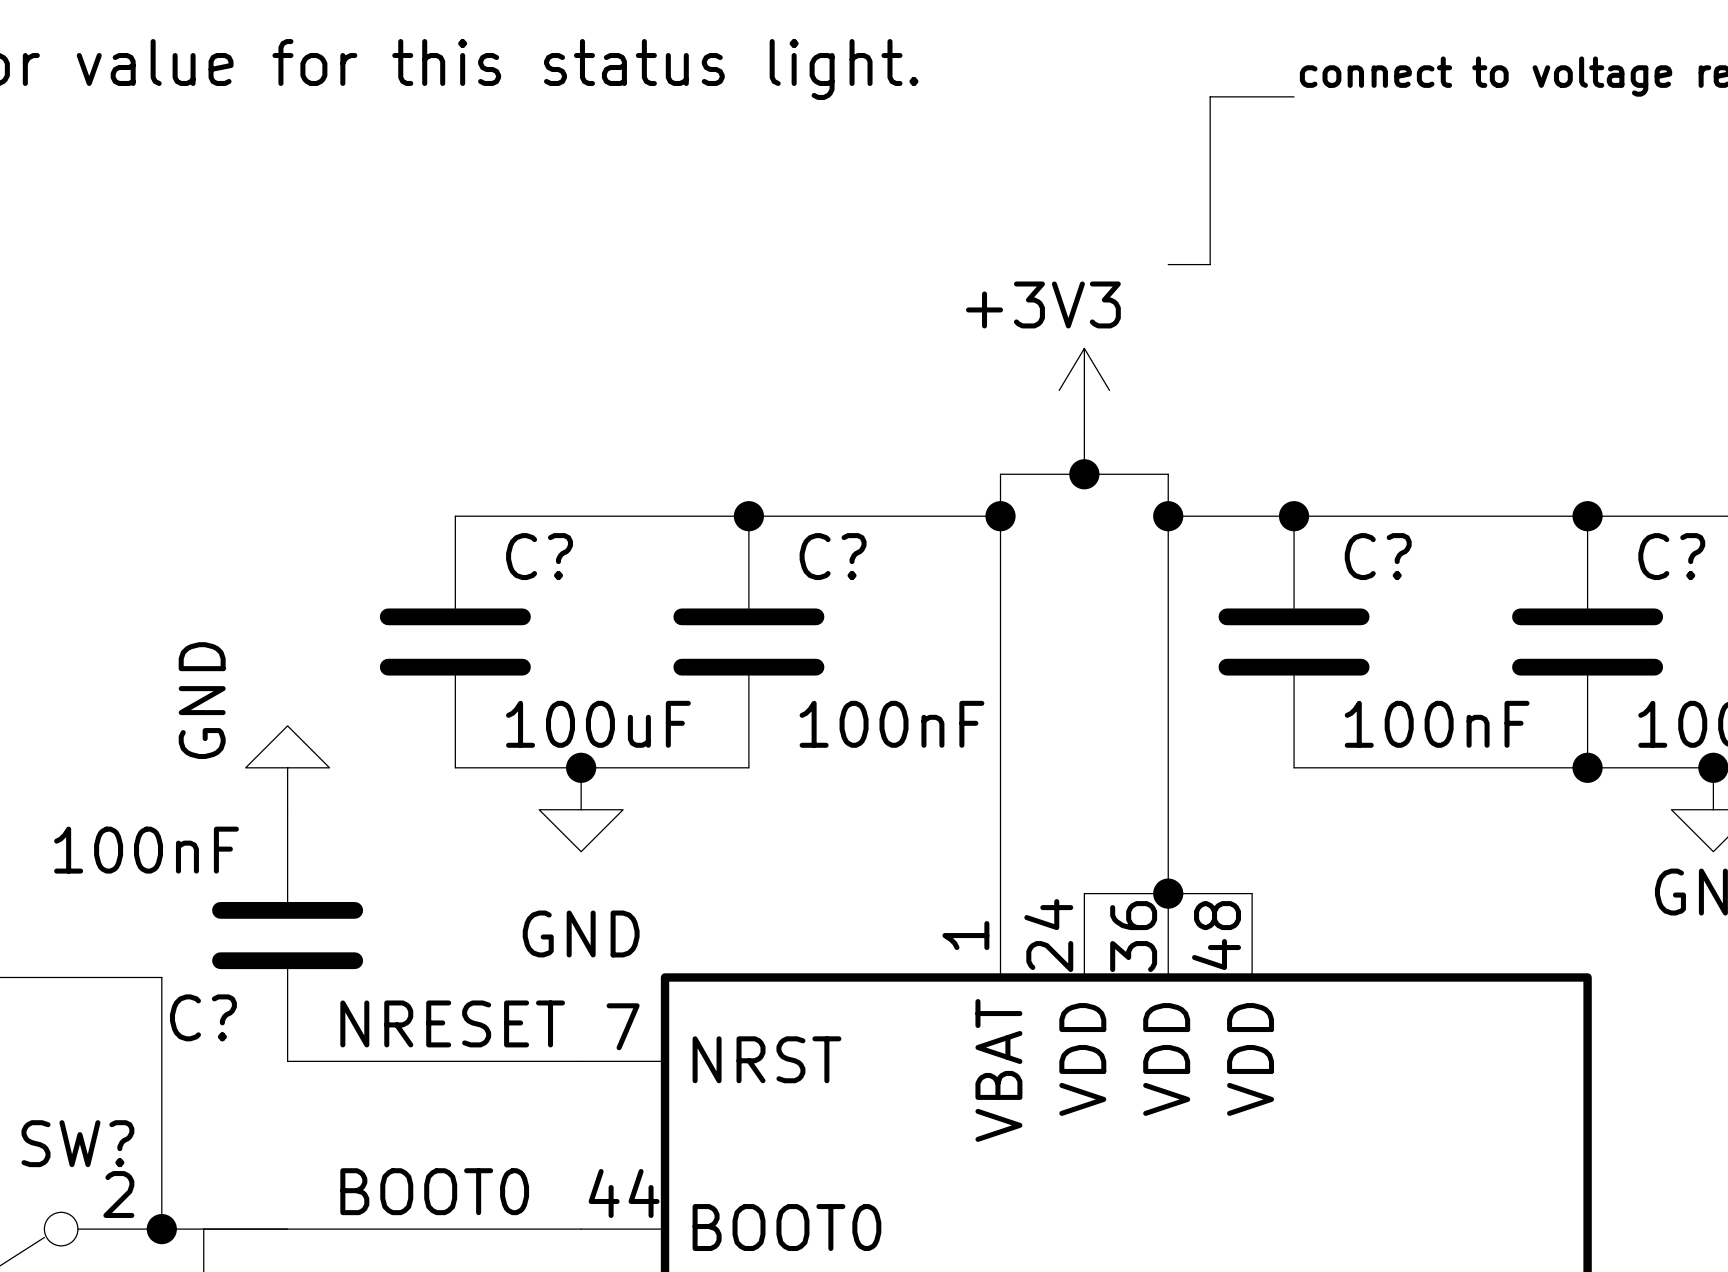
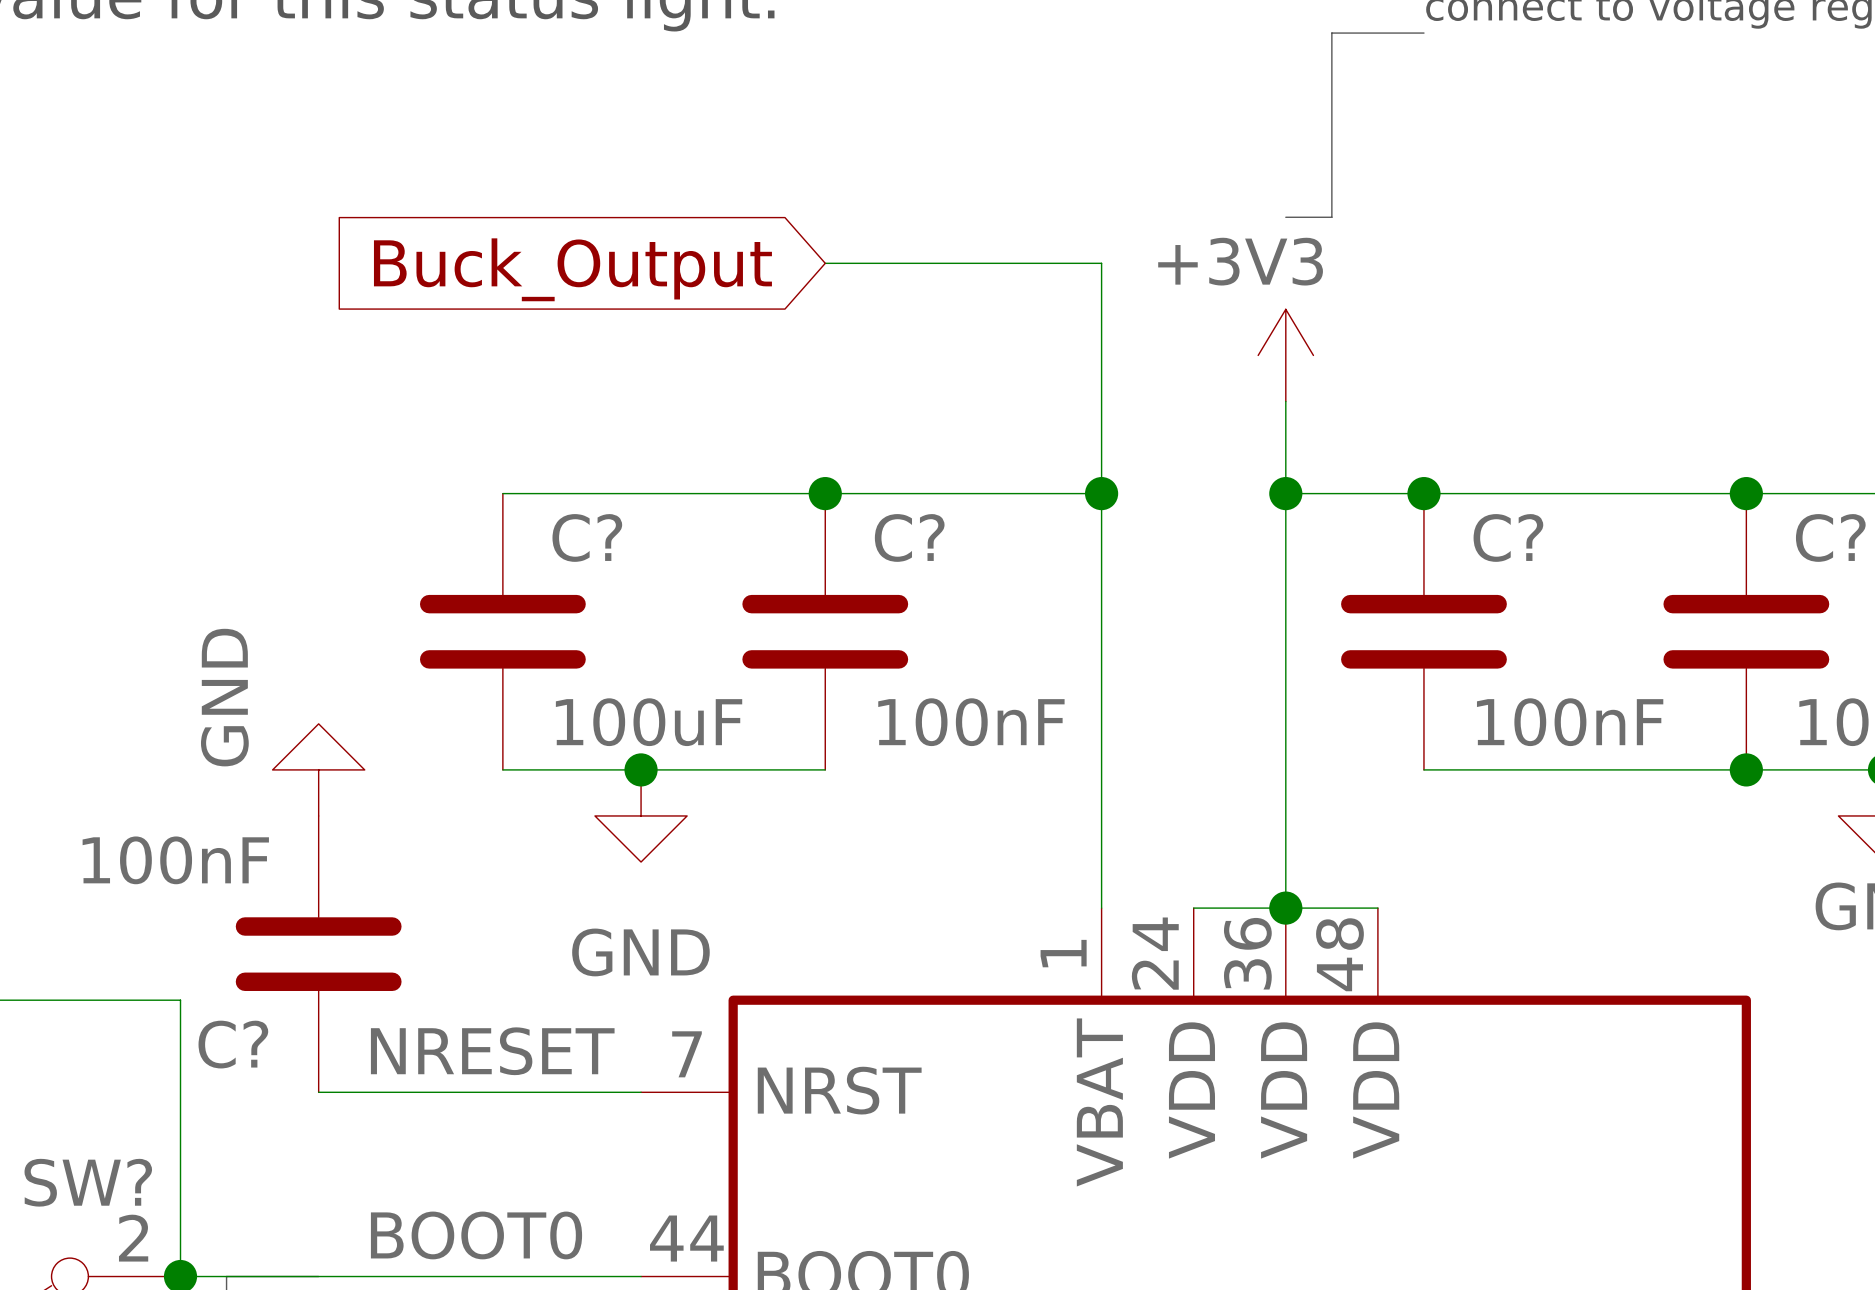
wire: none -> (825, 263) (1101, 263) (1101, 447)
global label: none -> Buck_Output (572, 269)
power symbol position: +3V3 (1084, 390) -> +3V3 (1285, 355)
wire: (1084, 432) (1084, 474) -> none
wire: (1000, 474) (1168, 474) -> (1285, 401) (1285, 447)
junction: (1084, 474) -> none

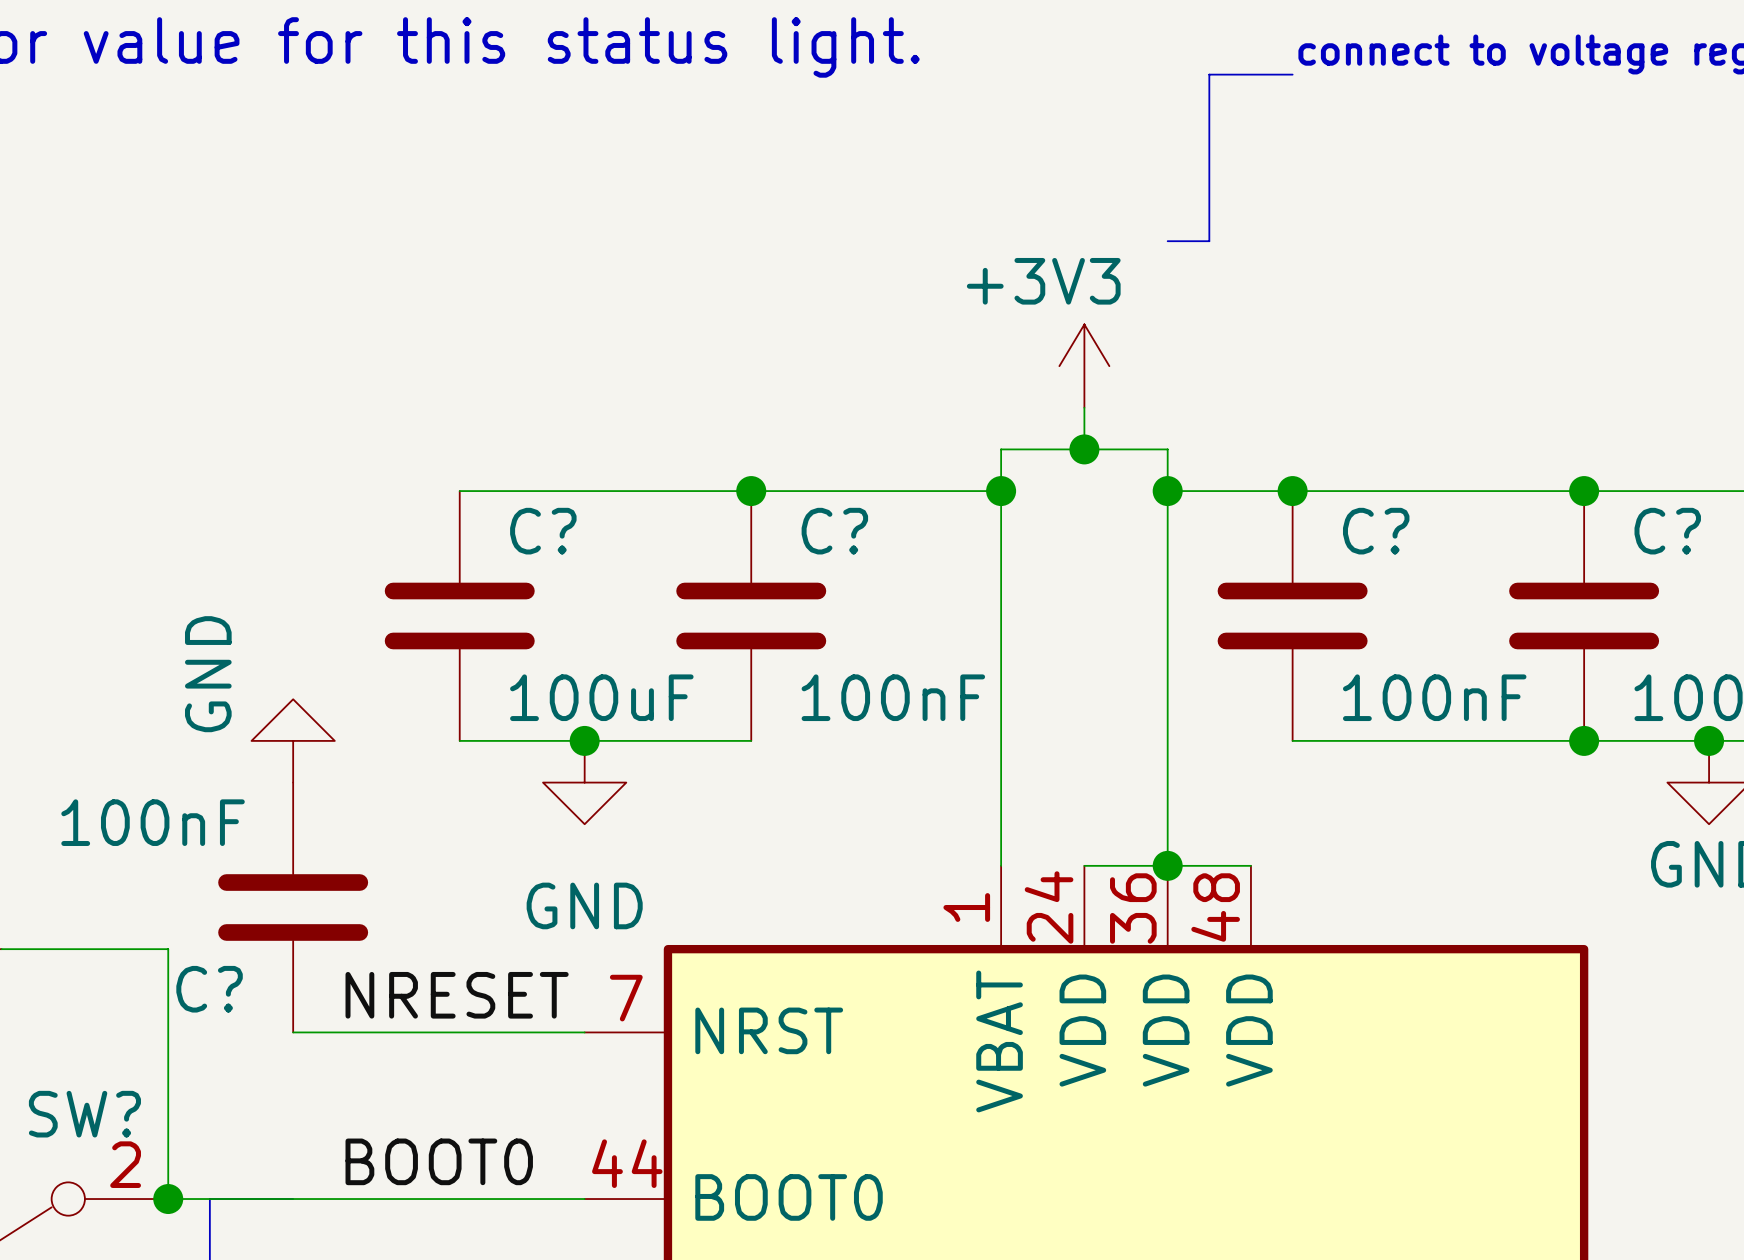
wire: (825, 263) (1101, 263) (1101, 447) -> none
global label: Buck_Output (572, 269) -> none
power symbol position: +3V3 (1285, 355) -> +3V3 (1084, 366)
wire: none -> (1084, 407) (1084, 449)
wire: (1285, 401) (1285, 447) -> (1001, 449) (1167, 449)
junction: none -> (1084, 449)

